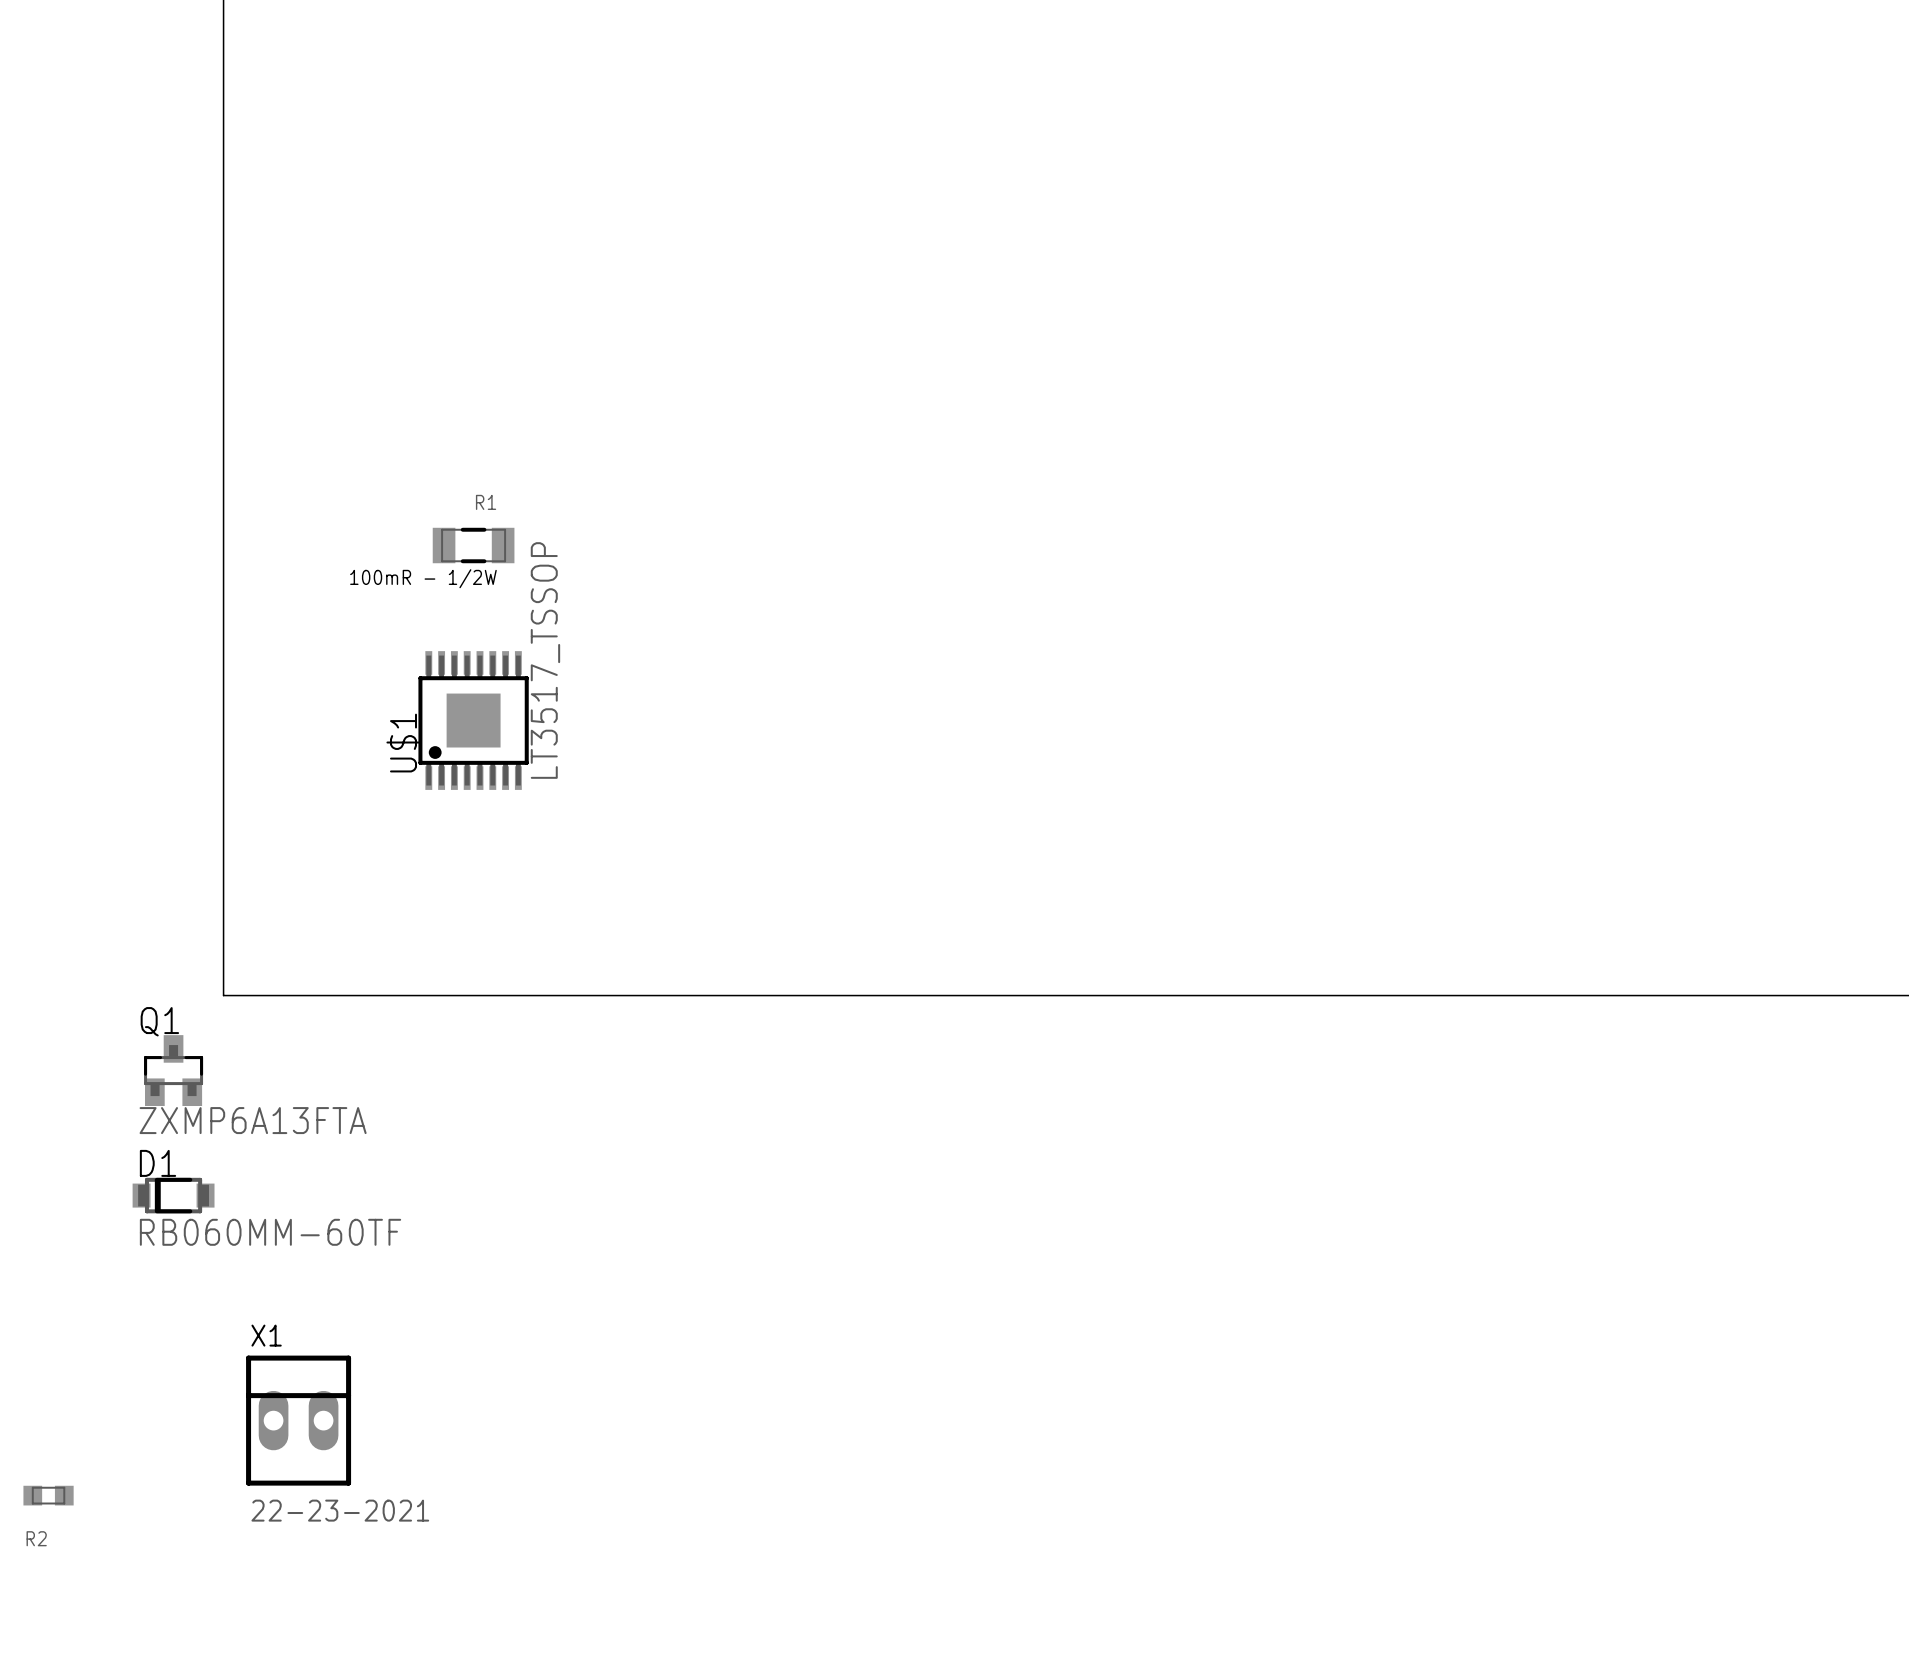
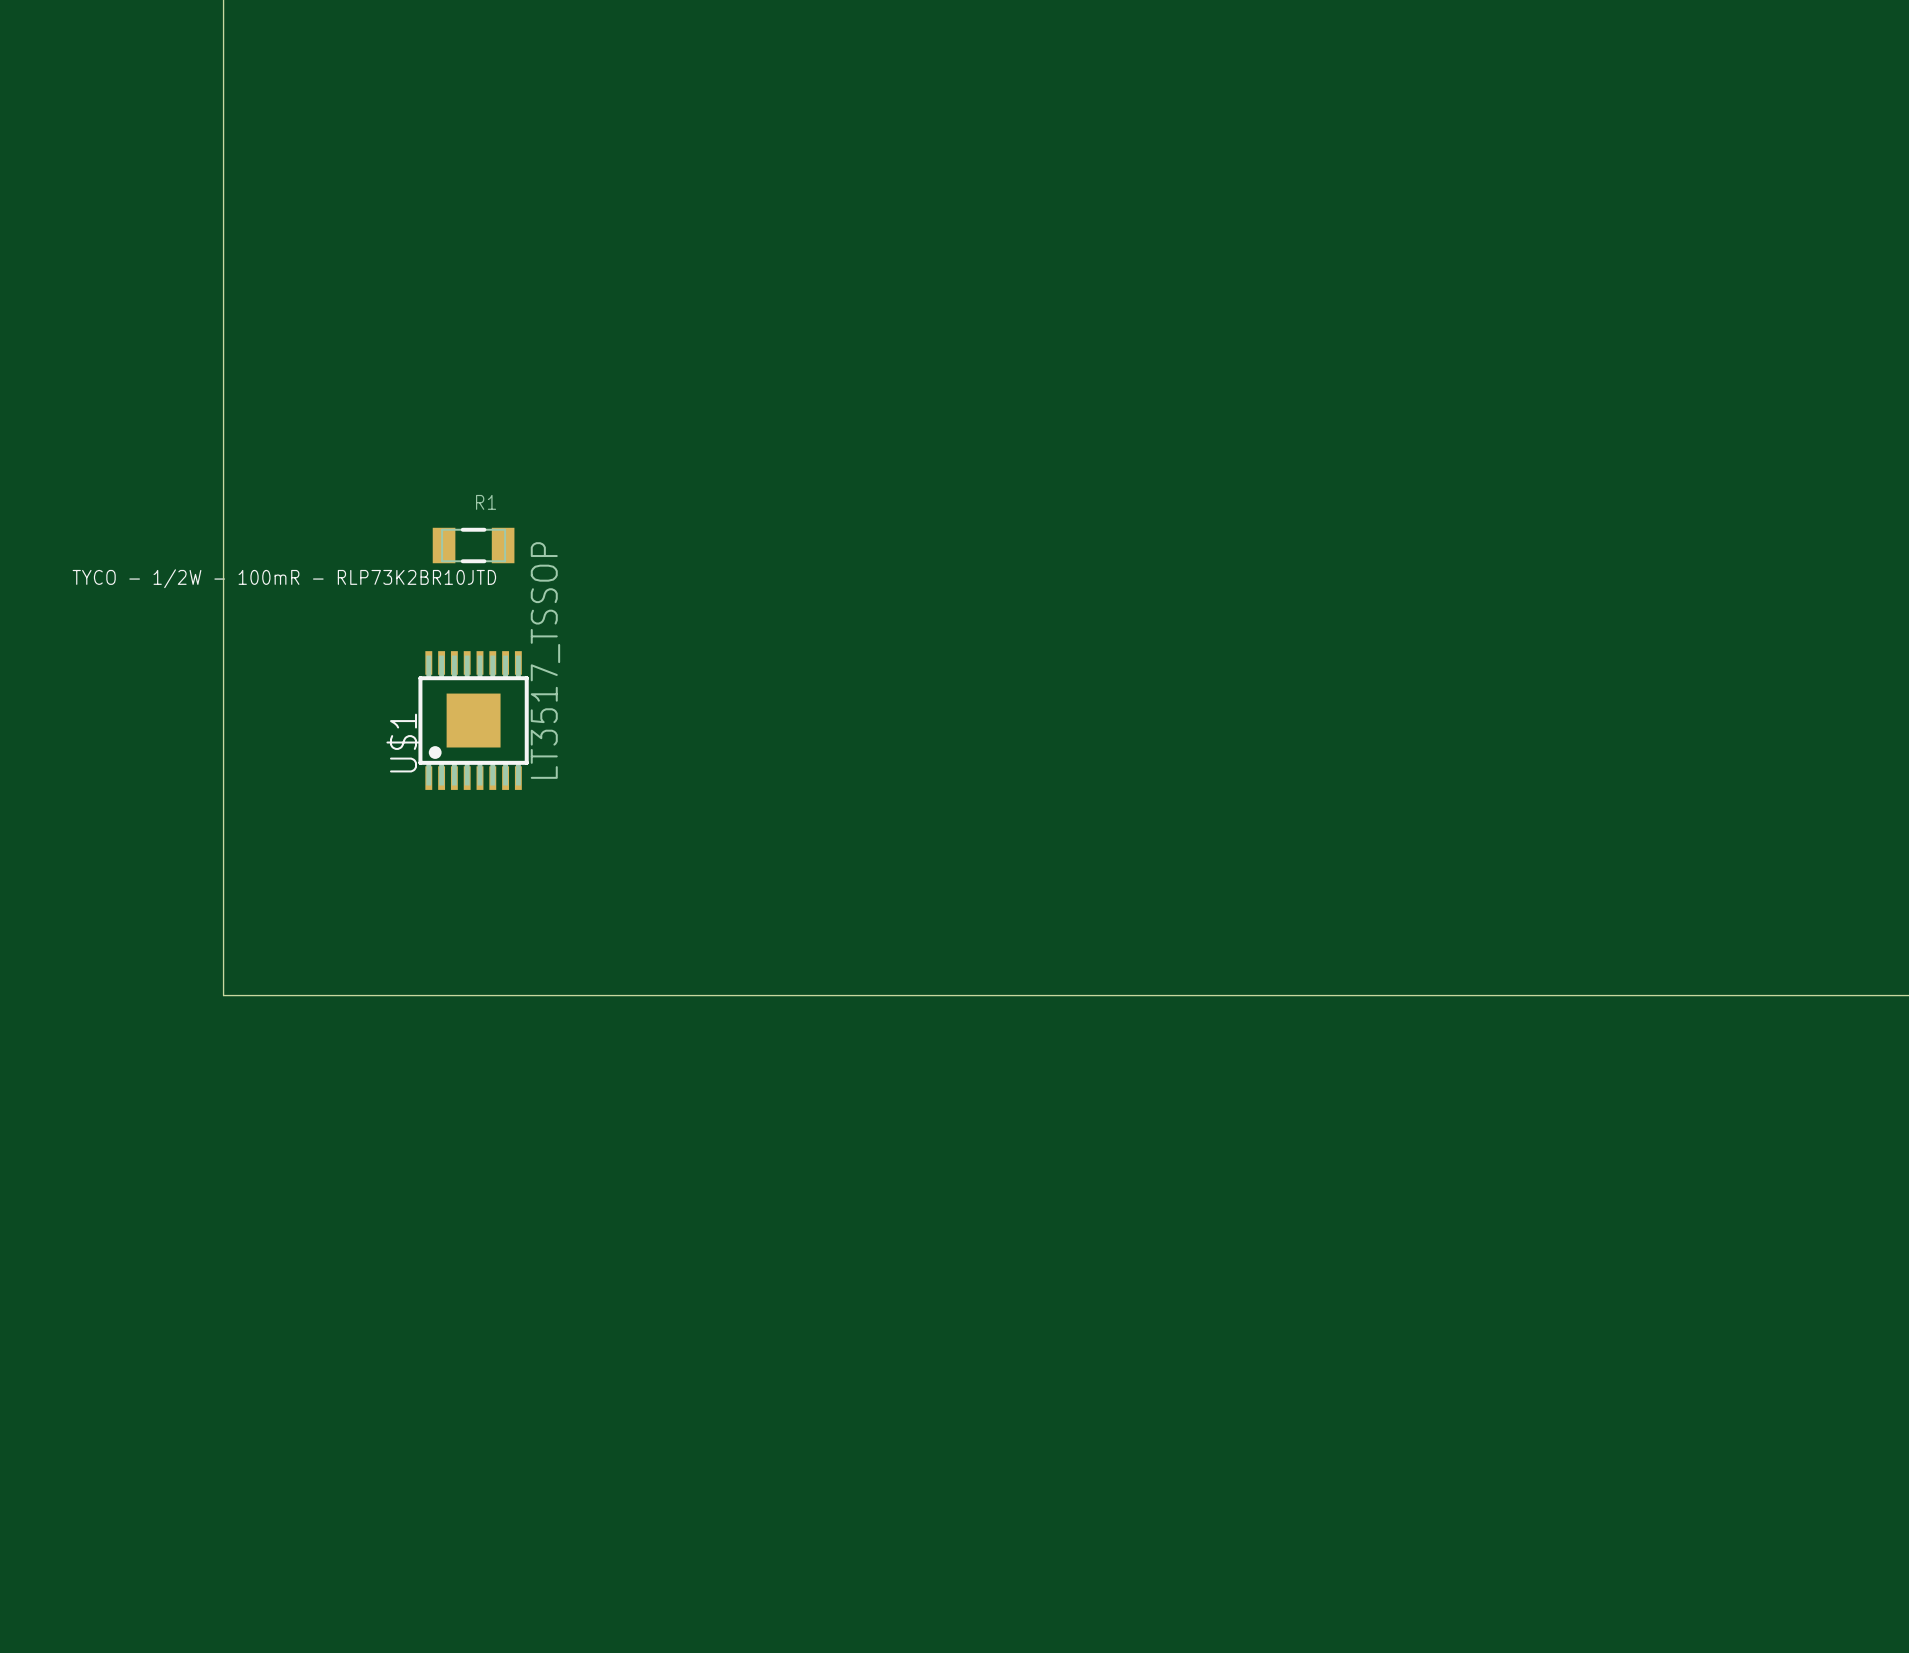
R1 value: 100mR - 1/2W (423, 578) -> TYCO - 1/2W - 100mR - RLP73K2BR10JTD (284, 578)
Q1: ZXMP6A13FTA (173, 1070) -> none
D1: RB060MM-60TF (173, 1195) -> none
X1: 22-23-2021 (298, 1420) -> none
R2: (48, 1495) -> none

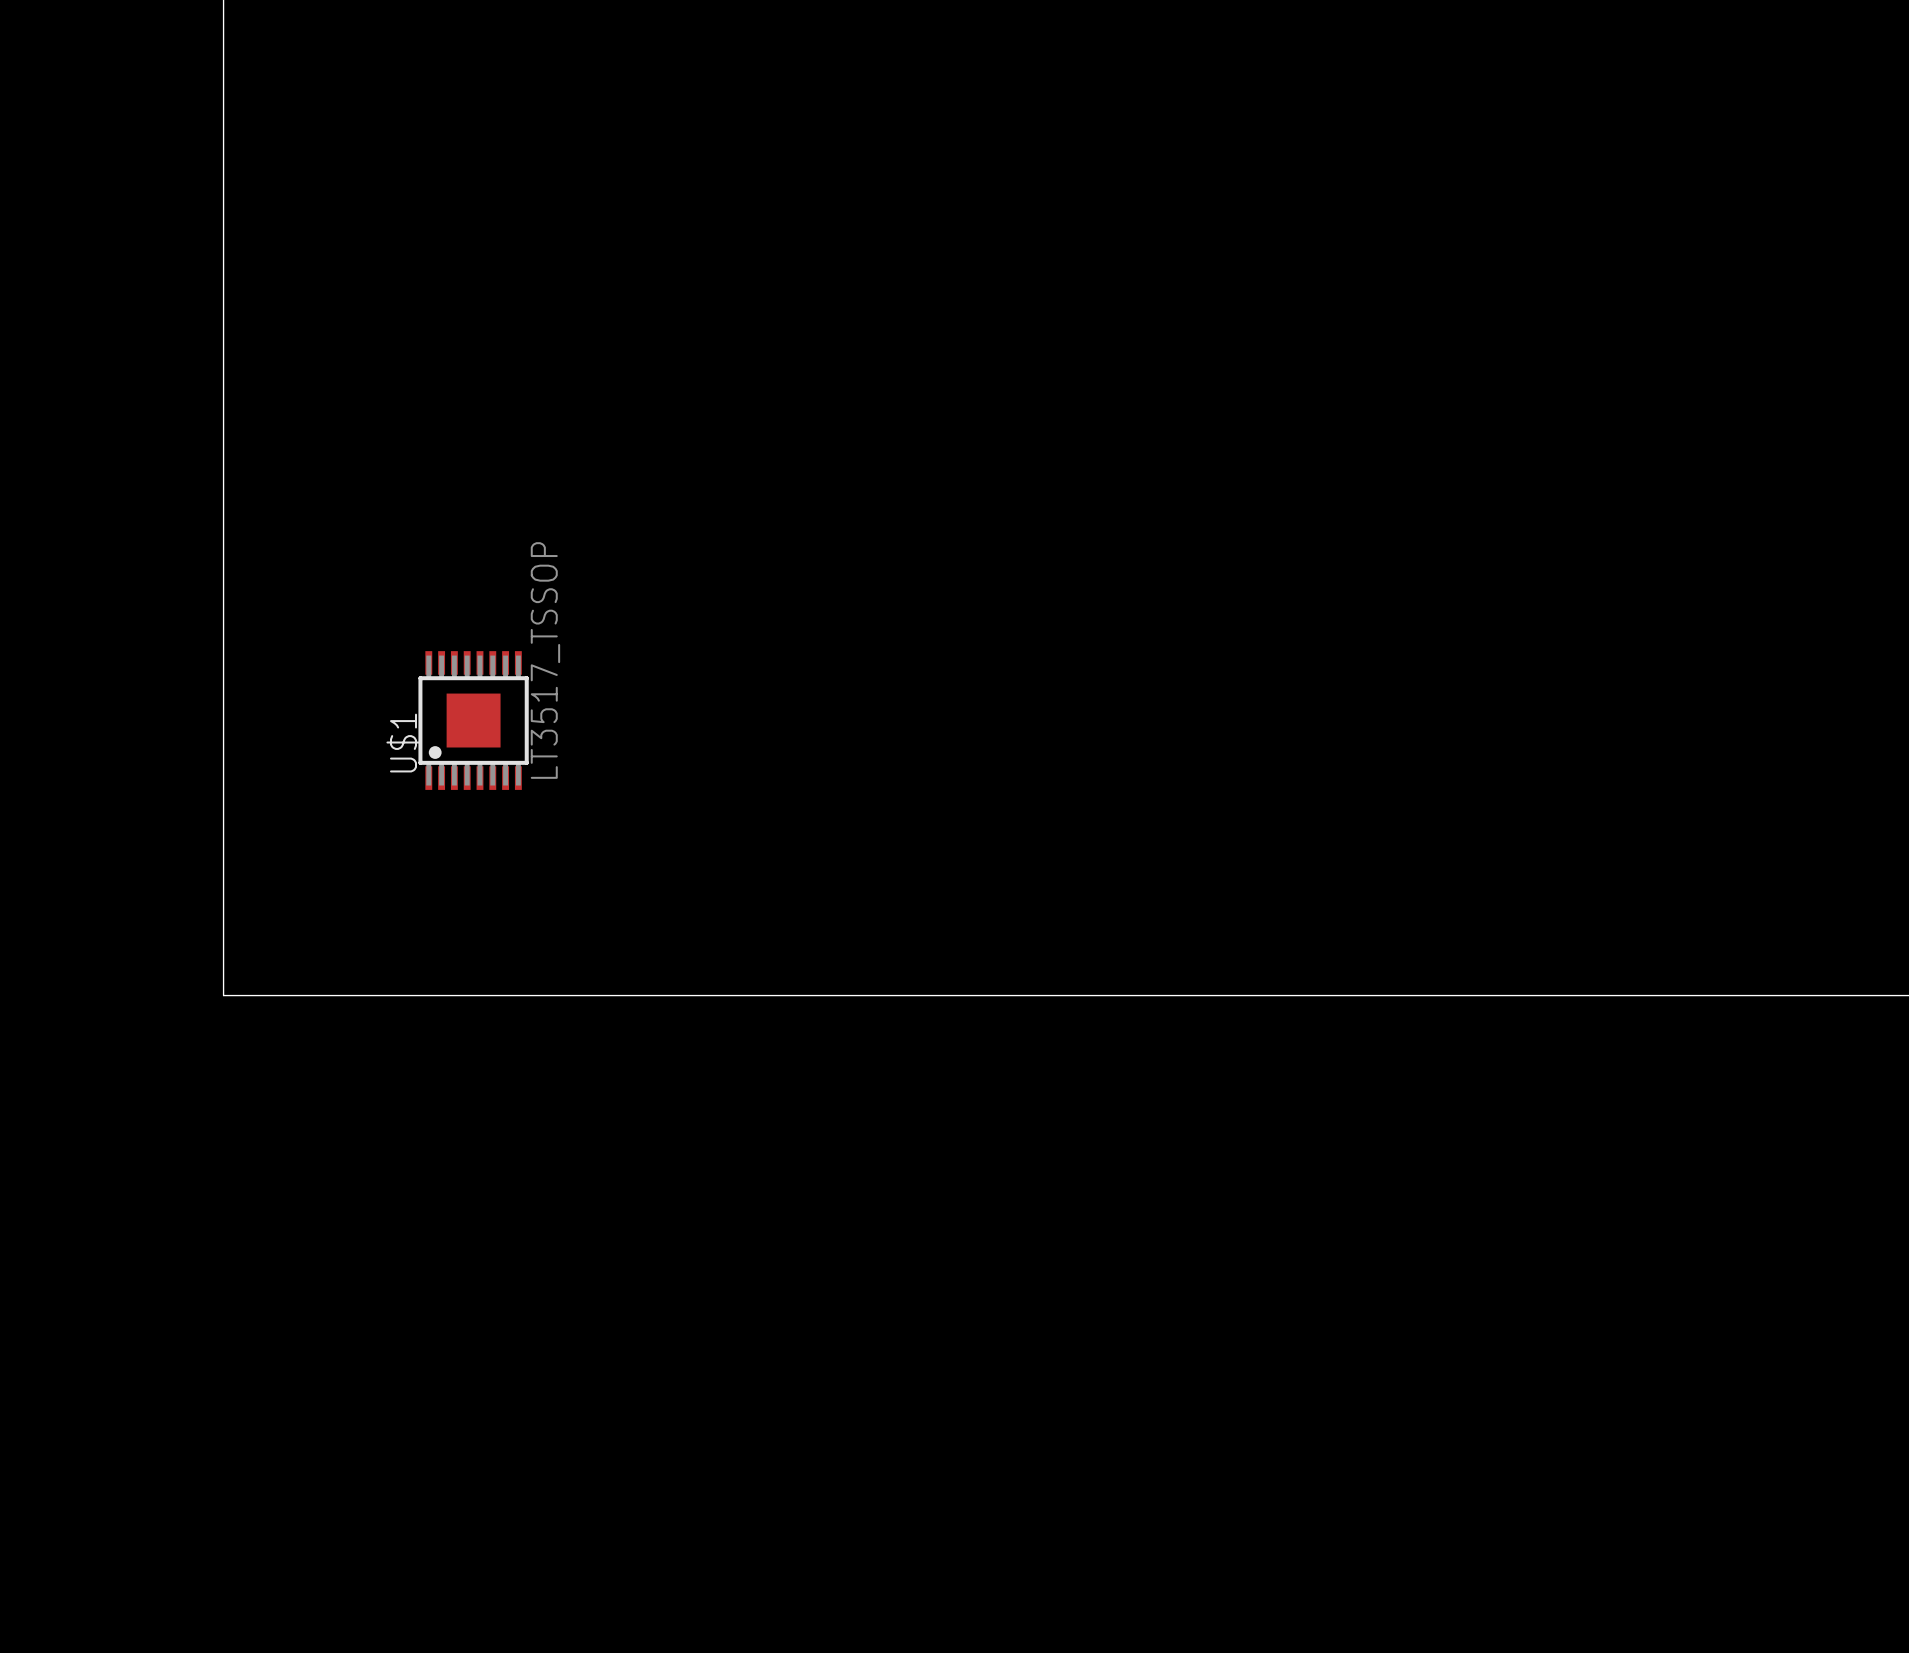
R1: TYCO - 1/2W - 100mR - RLP73K2BR10JTD (473, 545) -> none

